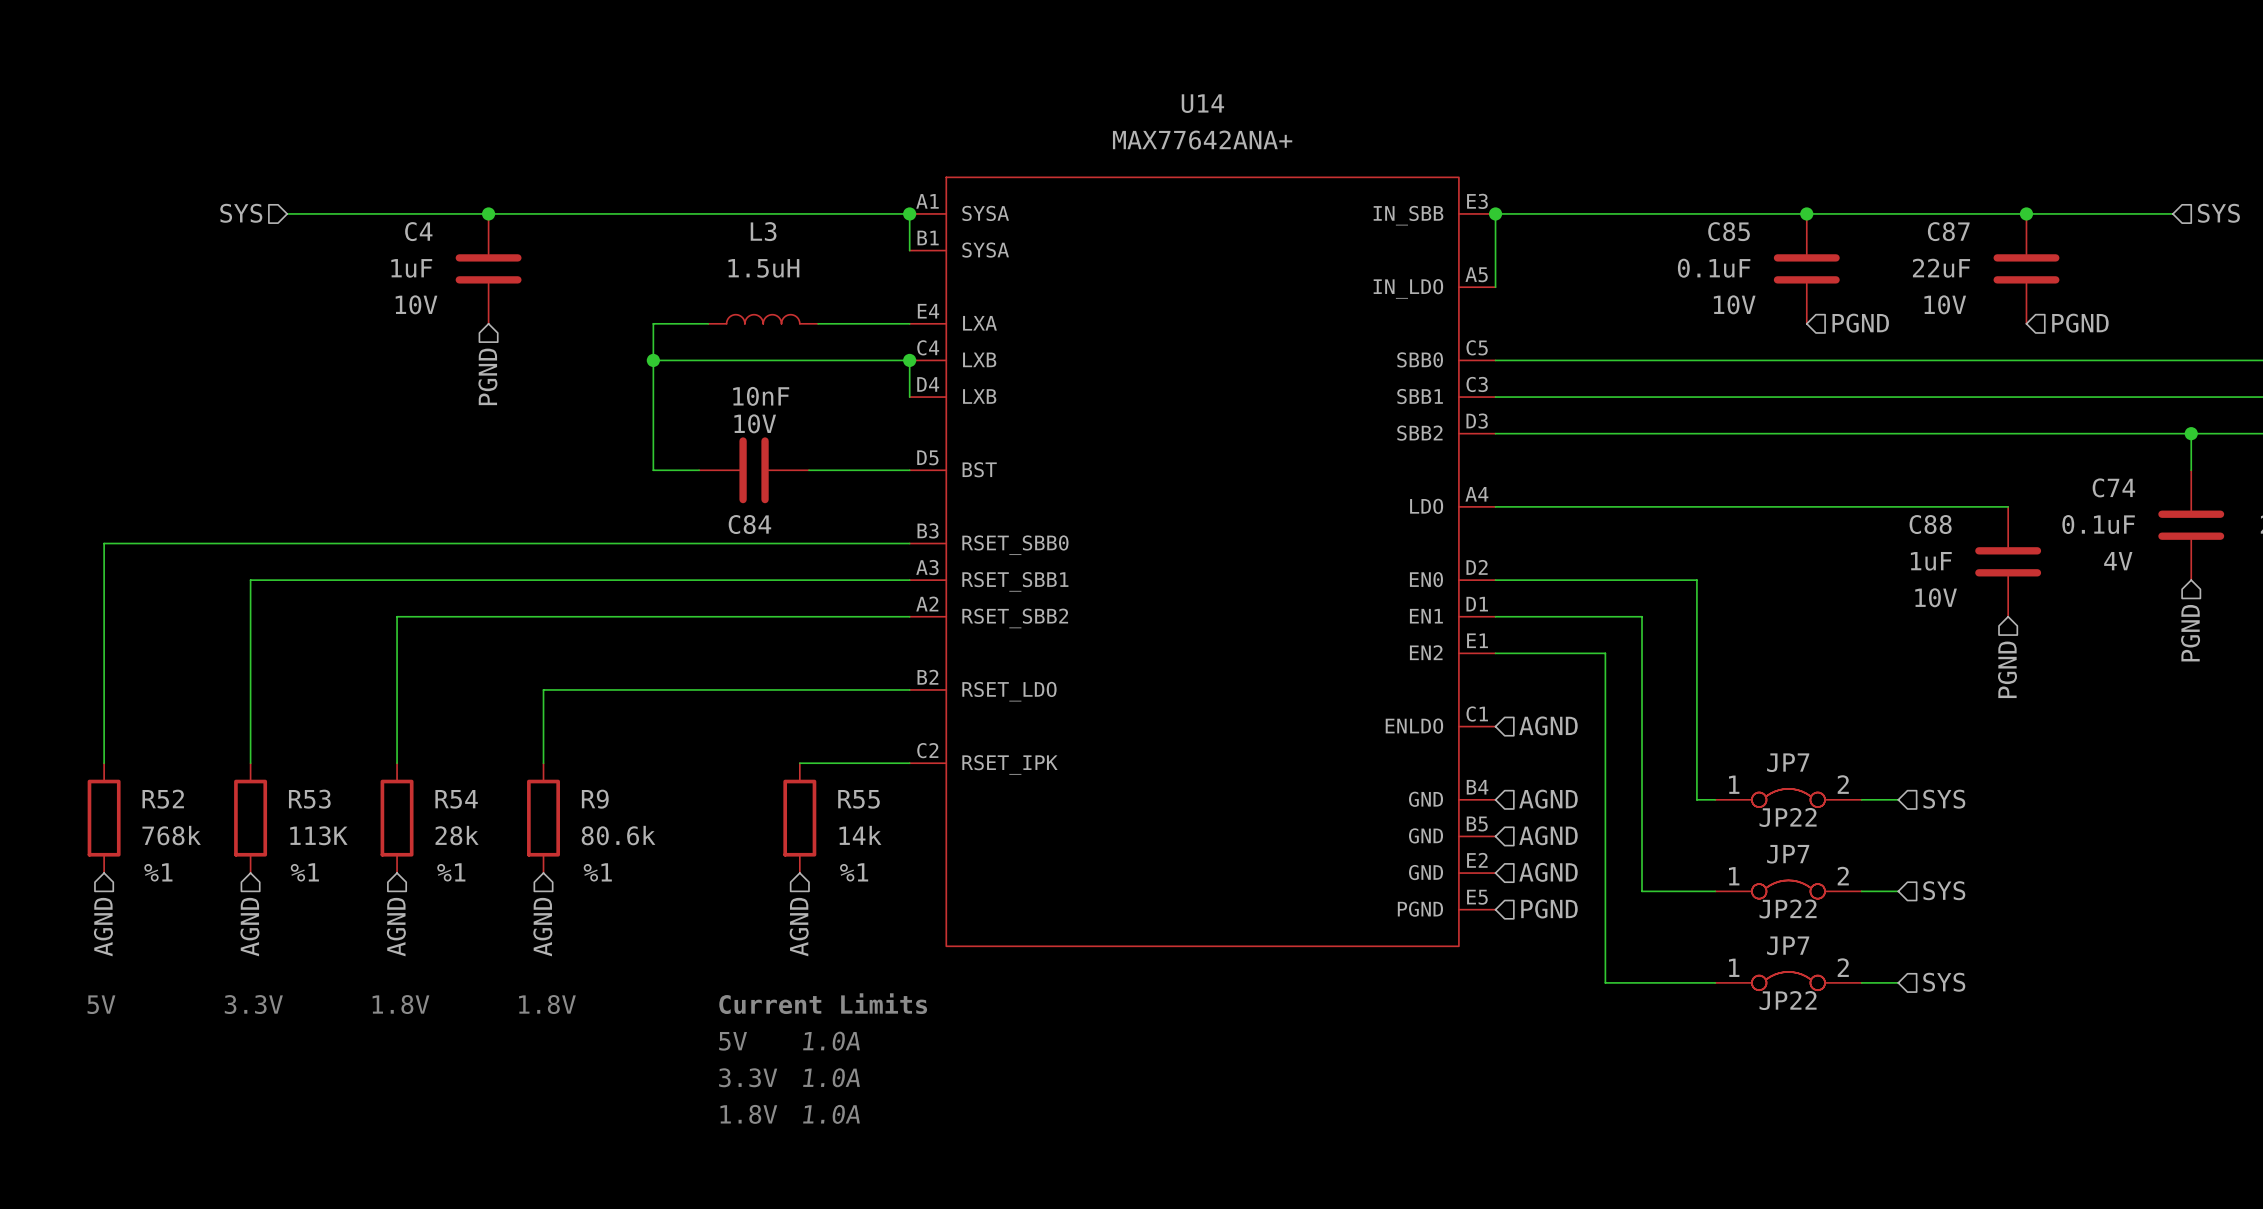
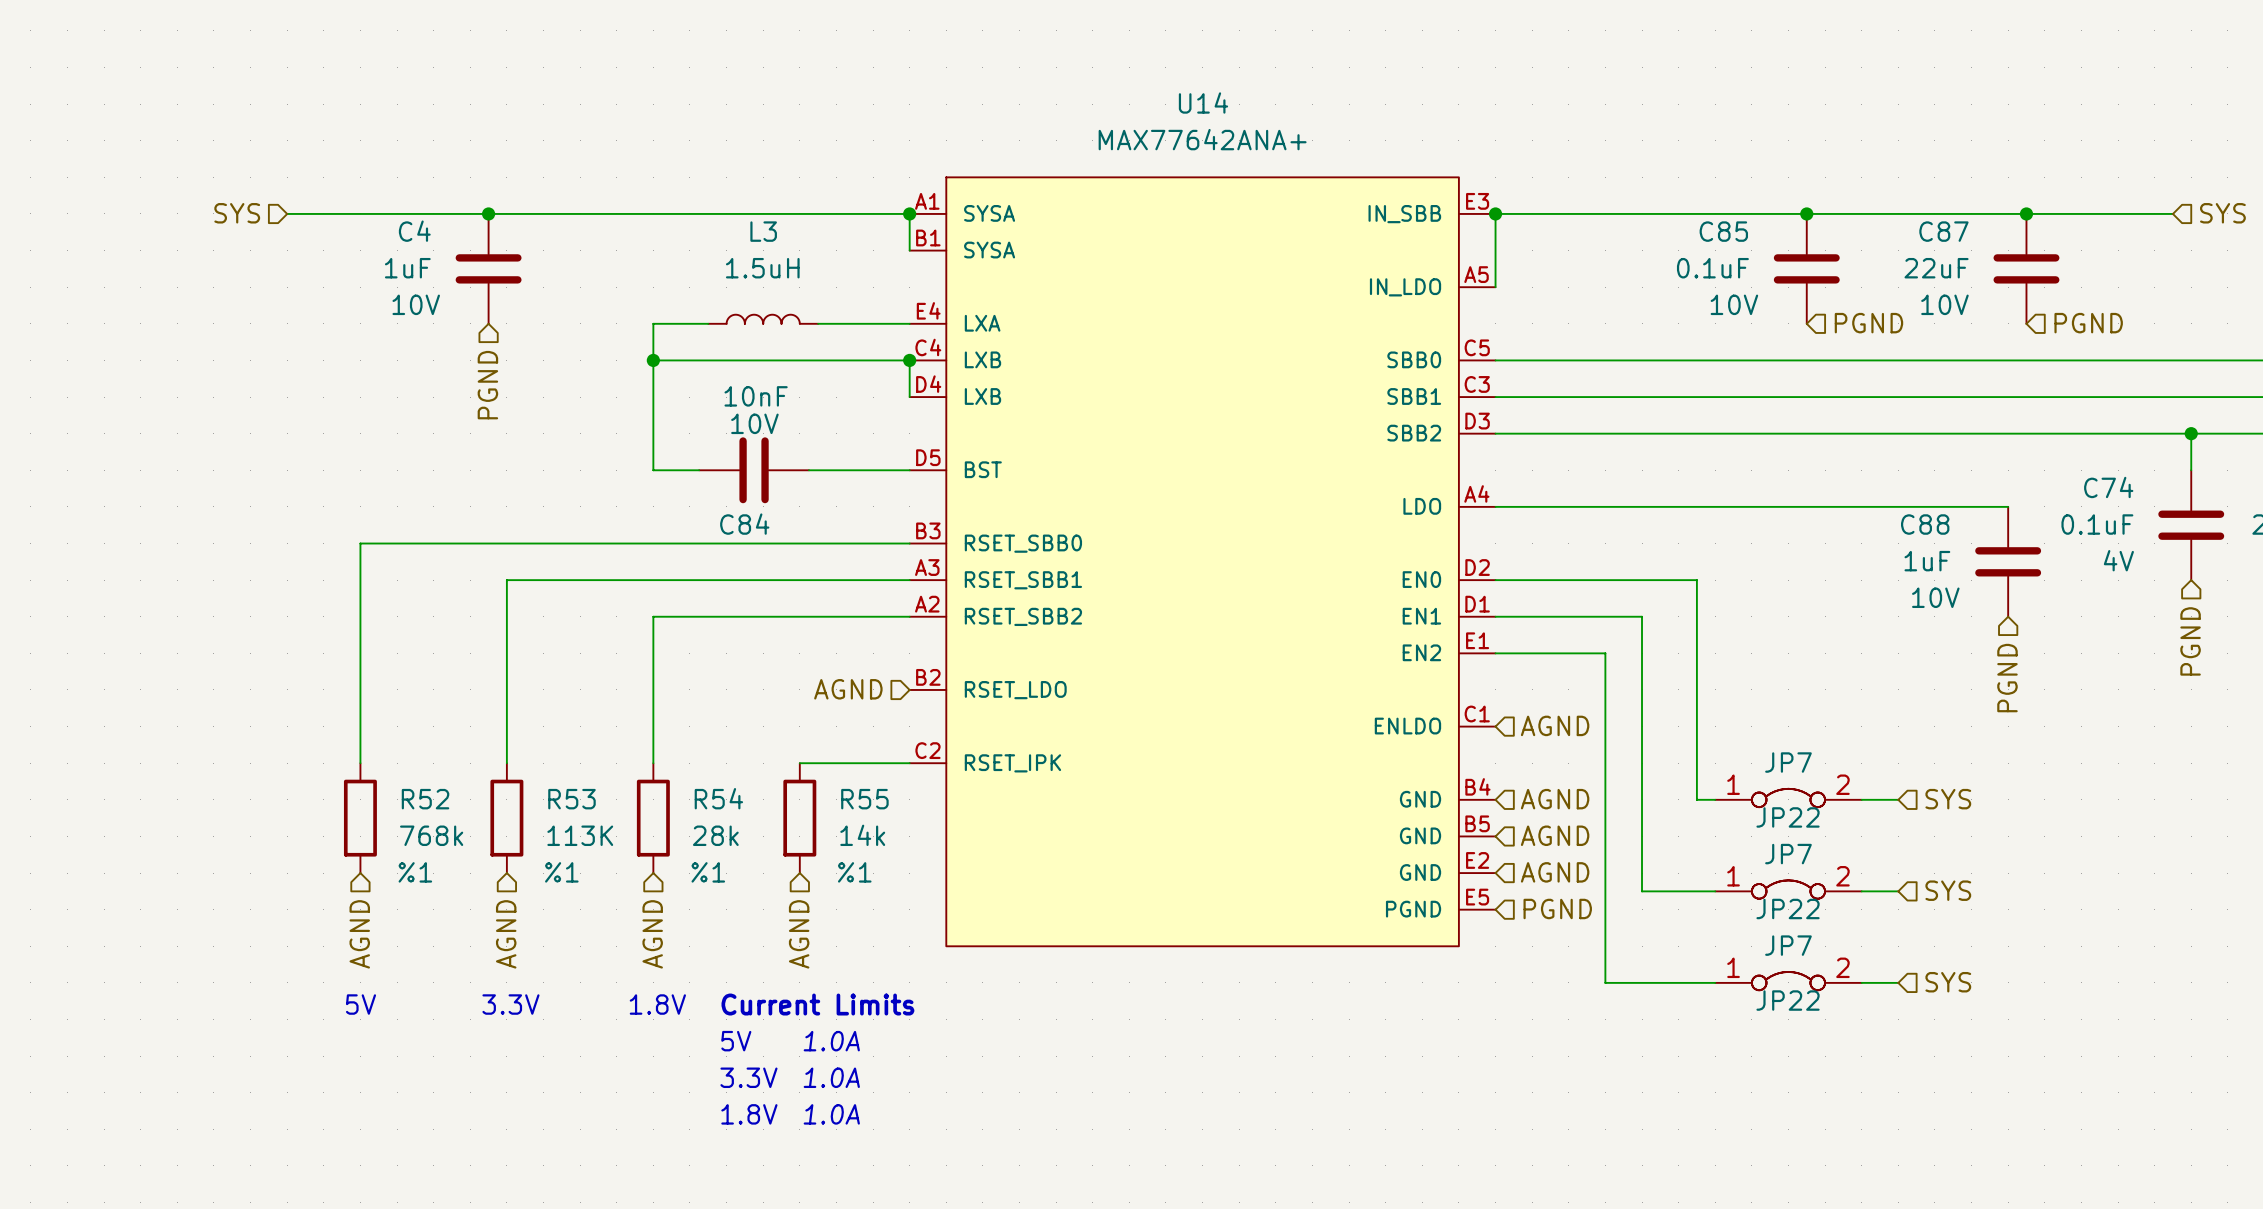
wire: (360, 543) (104, 543) (104, 763) -> (360, 543) (360, 763)
wire: (506, 580) (250, 580) (250, 763) -> (506, 580) (506, 763)
wire: (653, 616) (397, 616) (397, 763) -> (653, 616) (653, 763)
hierarchical label: none -> AGND (848, 689)
wire: (909, 689) (543, 689) (543, 763) -> none
R52 position: (104, 818) -> (360, 818)
R53 position: (250, 818) -> (506, 818)
R54 position: (397, 818) -> (653, 818)
R9: 80.6k (543, 818) -> none
hierarchical label: AGND (103, 927) -> none
hierarchical label: AGND (249, 927) -> none
hierarchical label position: AGND (396, 927) -> AGND (359, 934)
hierarchical label position: AGND (542, 927) -> AGND (506, 934)
hierarchical label: none -> AGND (652, 934)
text position: 5V (101, 1004) -> 5V (361, 1004)
text position: 3.3V (253, 1004) -> 3.3V (510, 1004)
text: 1.8V (400, 1004) -> none
text position: 1.8V (547, 1004) -> 1.8V (657, 1004)

